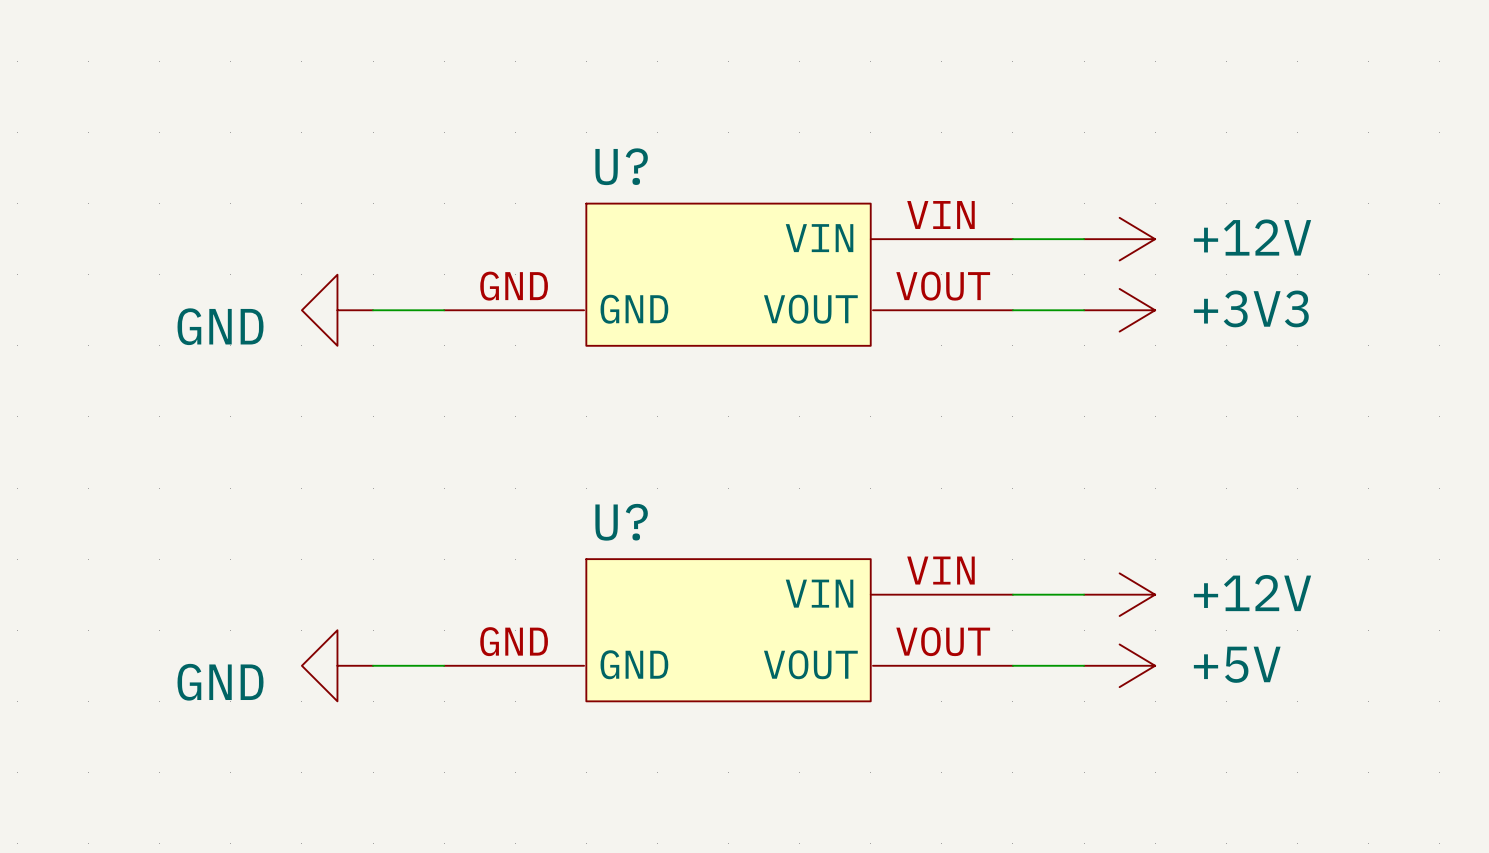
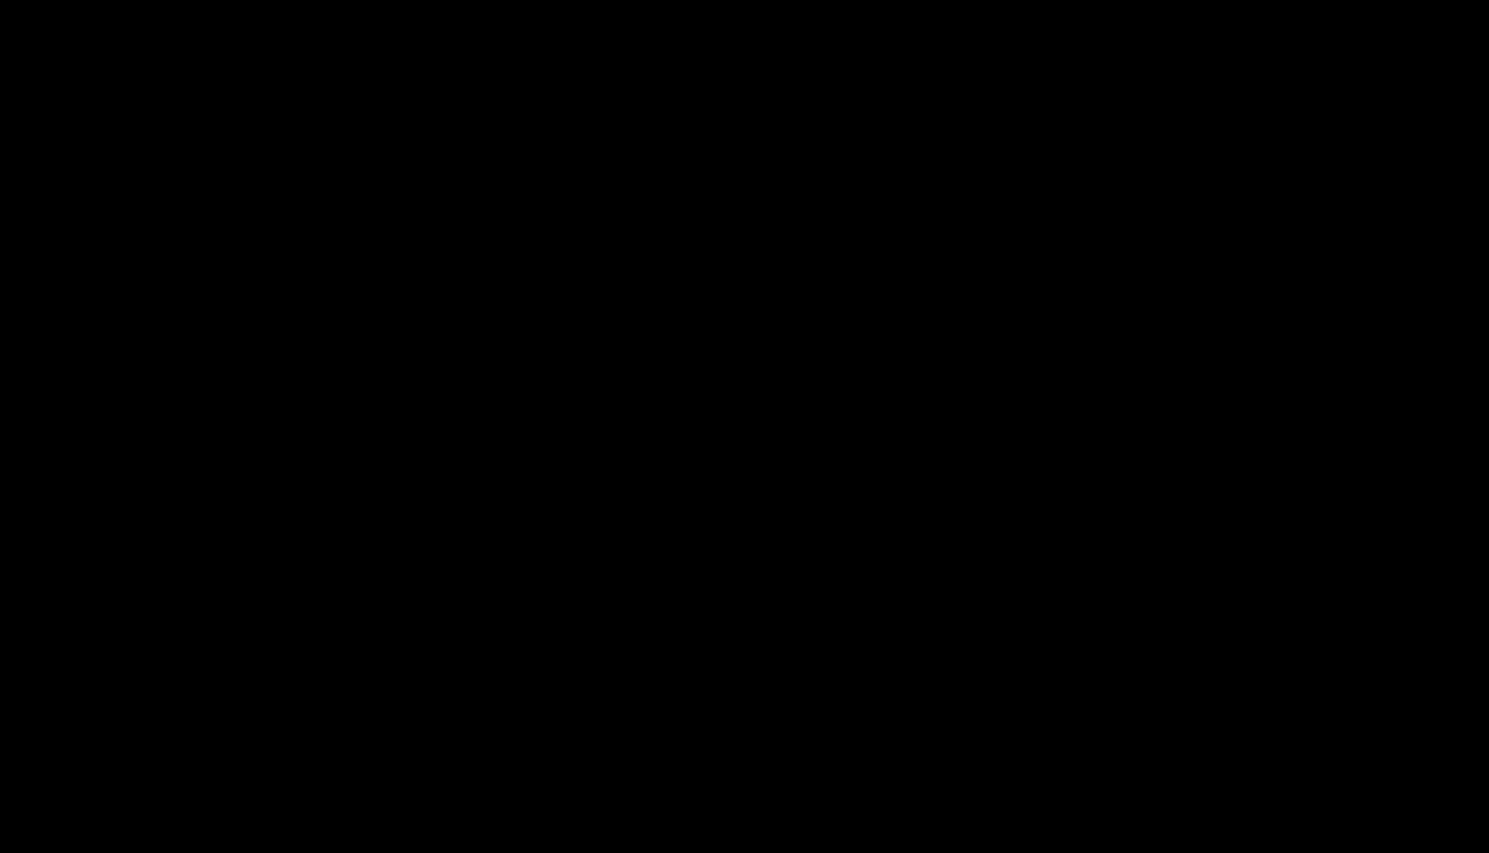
wire: (1012, 239) (1084, 239) -> none
power symbol: +12V (1119, 239) -> none
U?: (728, 274) -> none
power symbol: GND (337, 310) -> none
wire: (373, 310) (444, 310) -> none
wire: (1012, 310) (1084, 310) -> none
power symbol: +3V3 (1119, 310) -> none
wire: (1012, 594) (1084, 594) -> none
power symbol: +12V (1119, 594) -> none
U?: (728, 630) -> none
power symbol: GND (337, 665) -> none
wire: (373, 665) (444, 665) -> none
wire: (1012, 665) (1084, 665) -> none
power symbol: +5V (1119, 665) -> none

